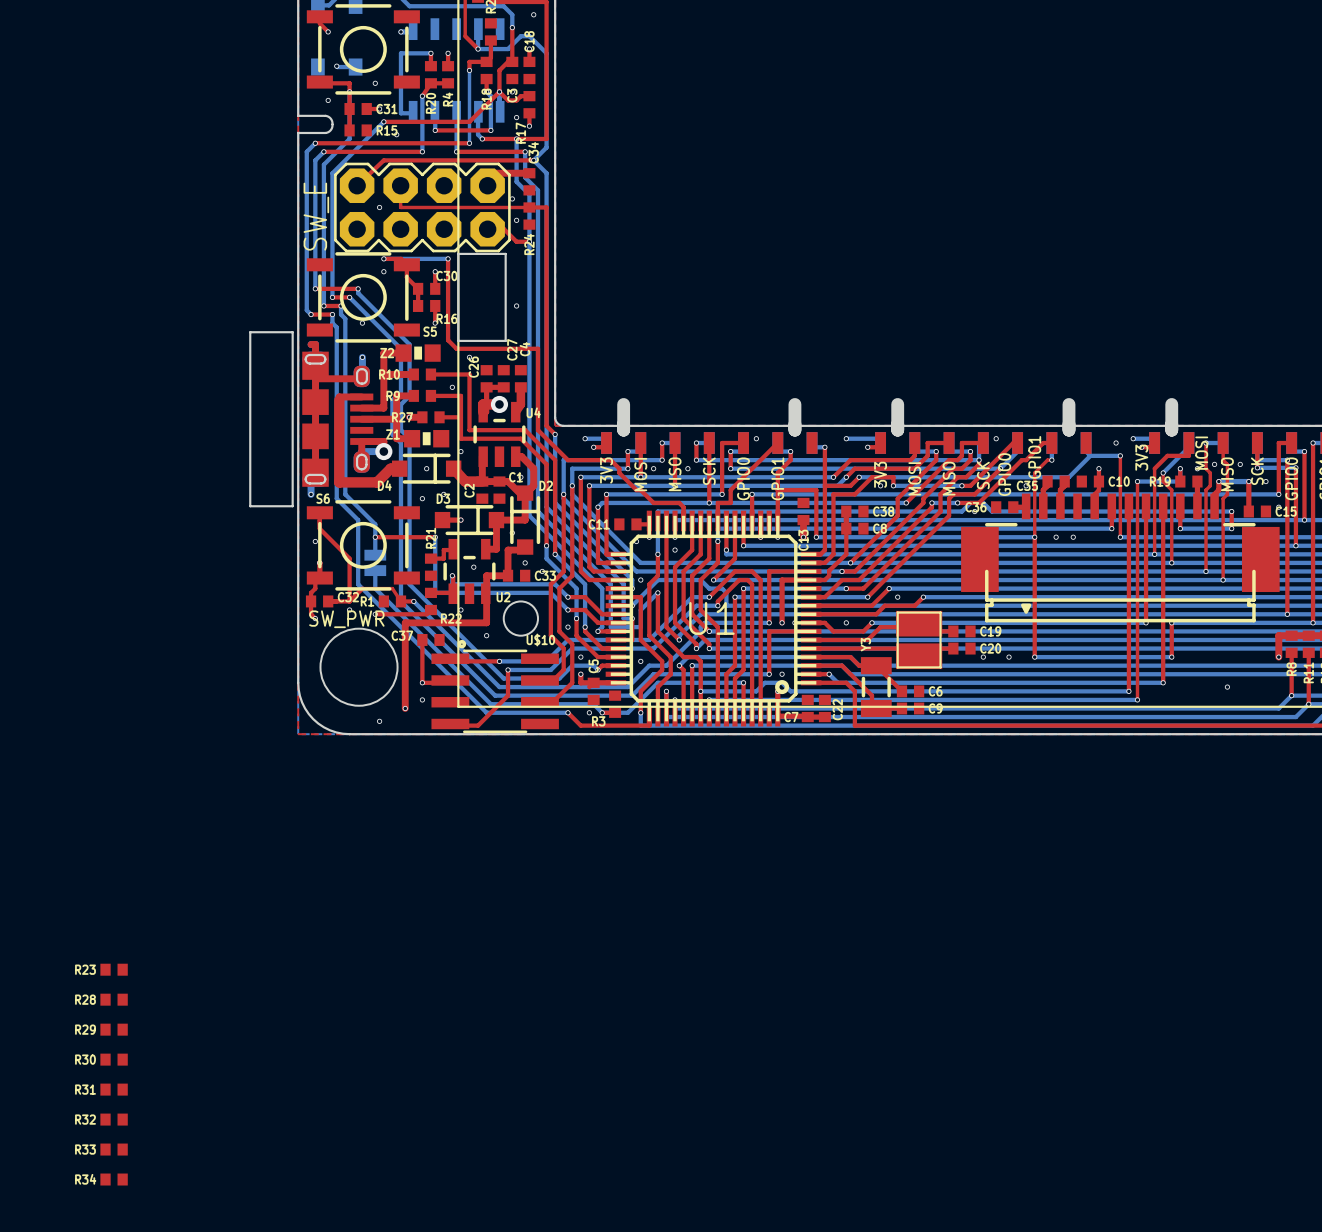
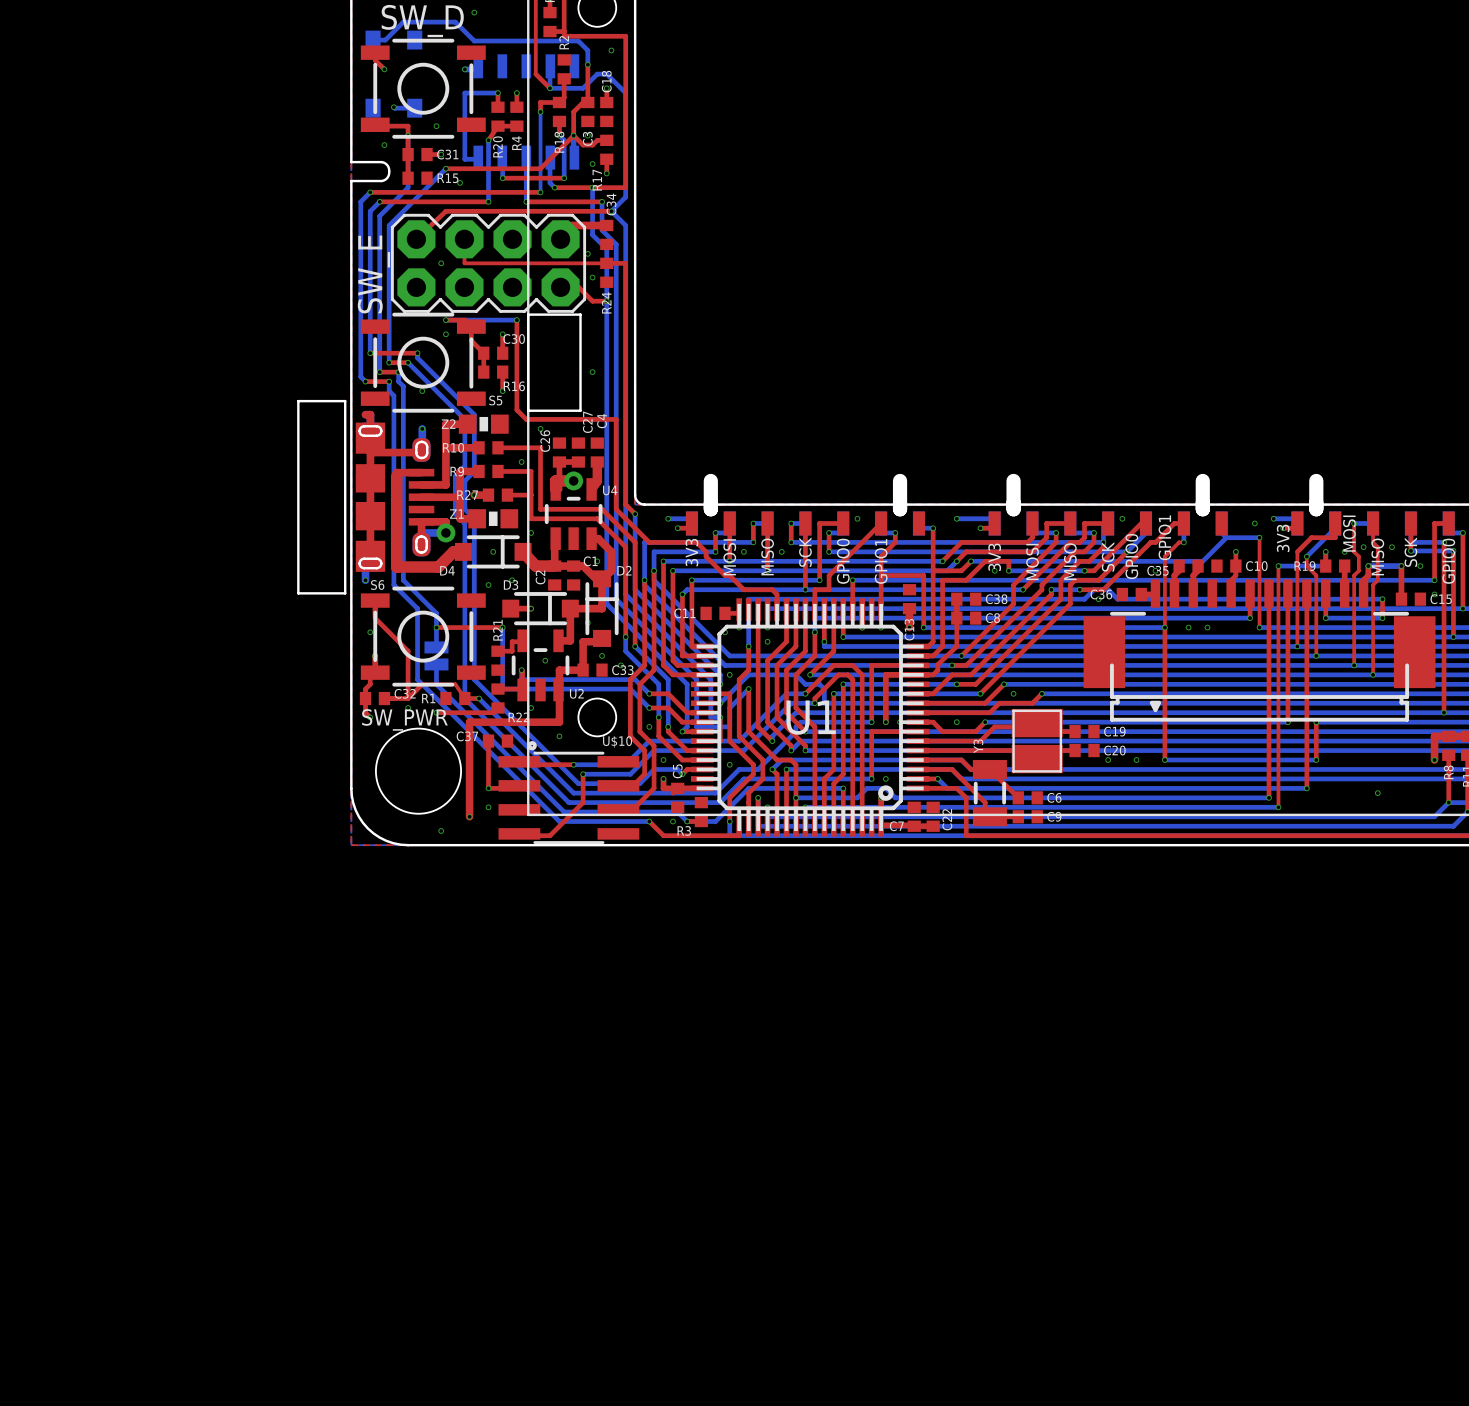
R23: (114, 969) -> none
R28: (114, 999) -> none
R29: (114, 1029) -> none
R30: (114, 1059) -> none
R31: (114, 1089) -> none
R32: (114, 1119) -> none
R33: (114, 1149) -> none
R34: (114, 1179) -> none

